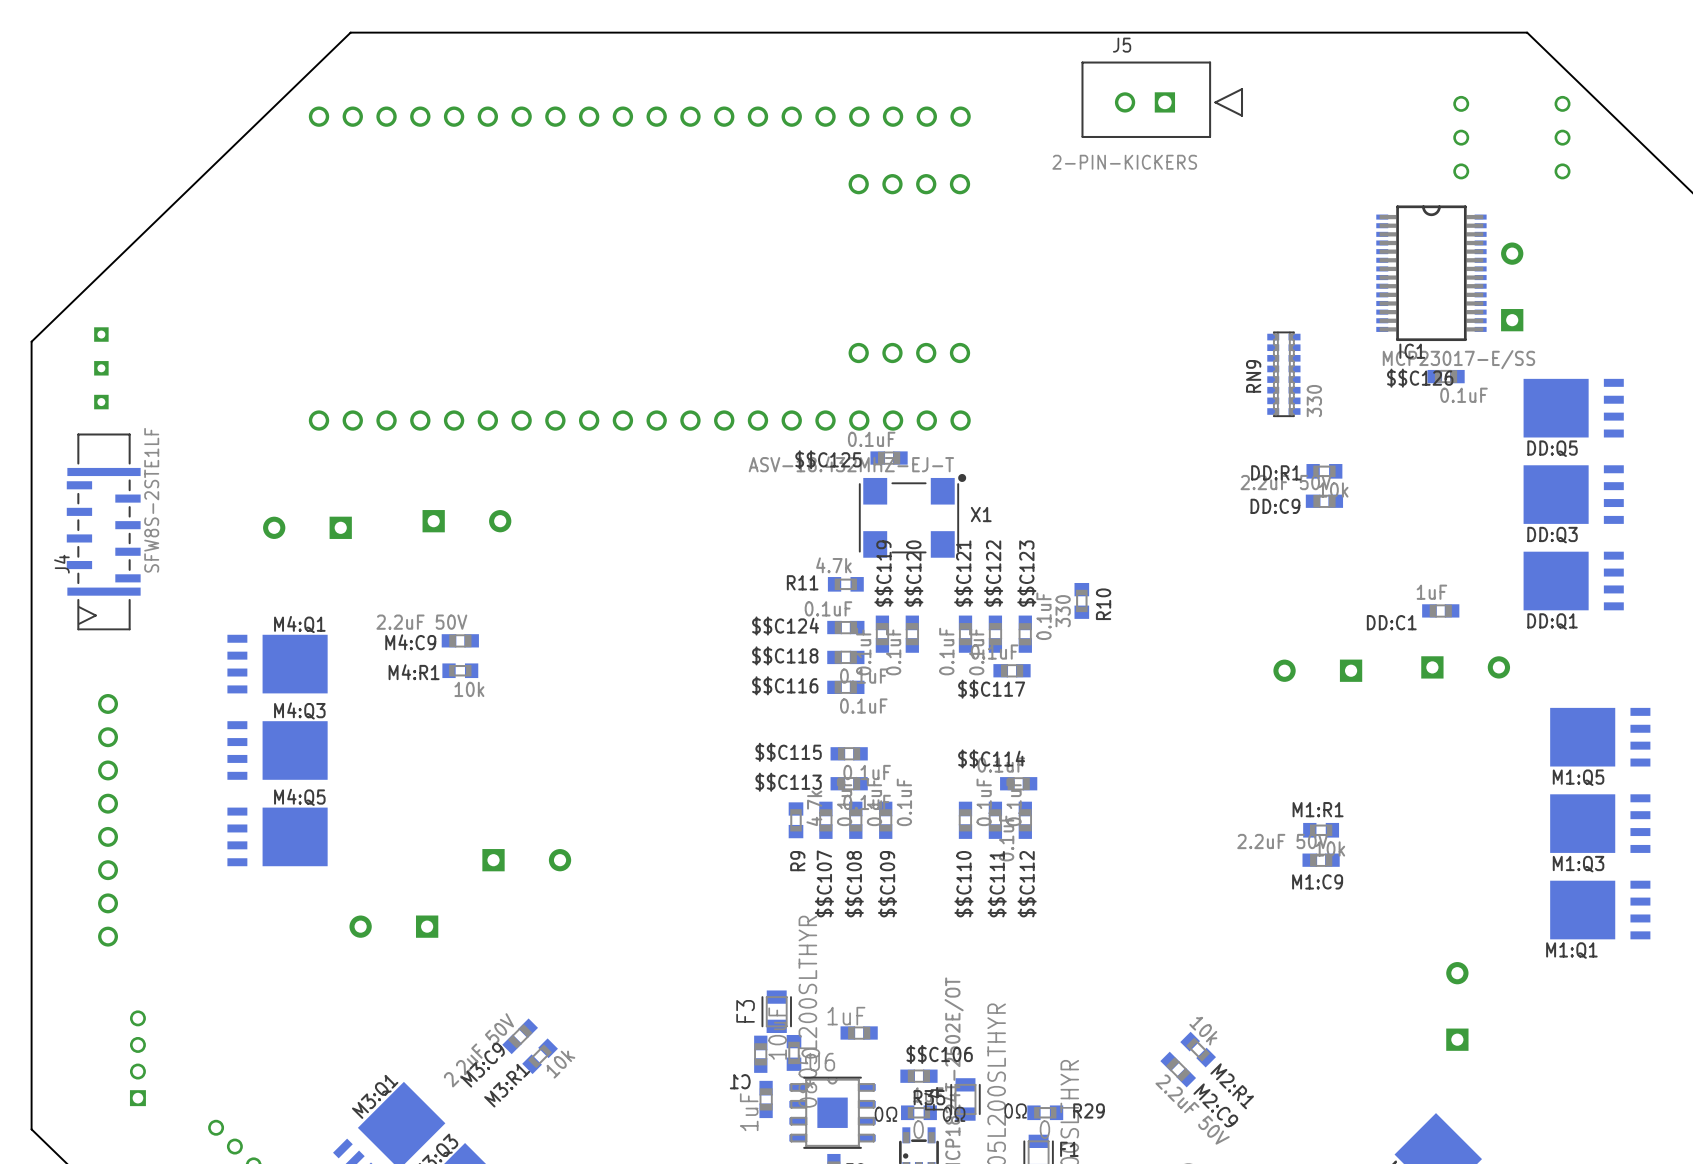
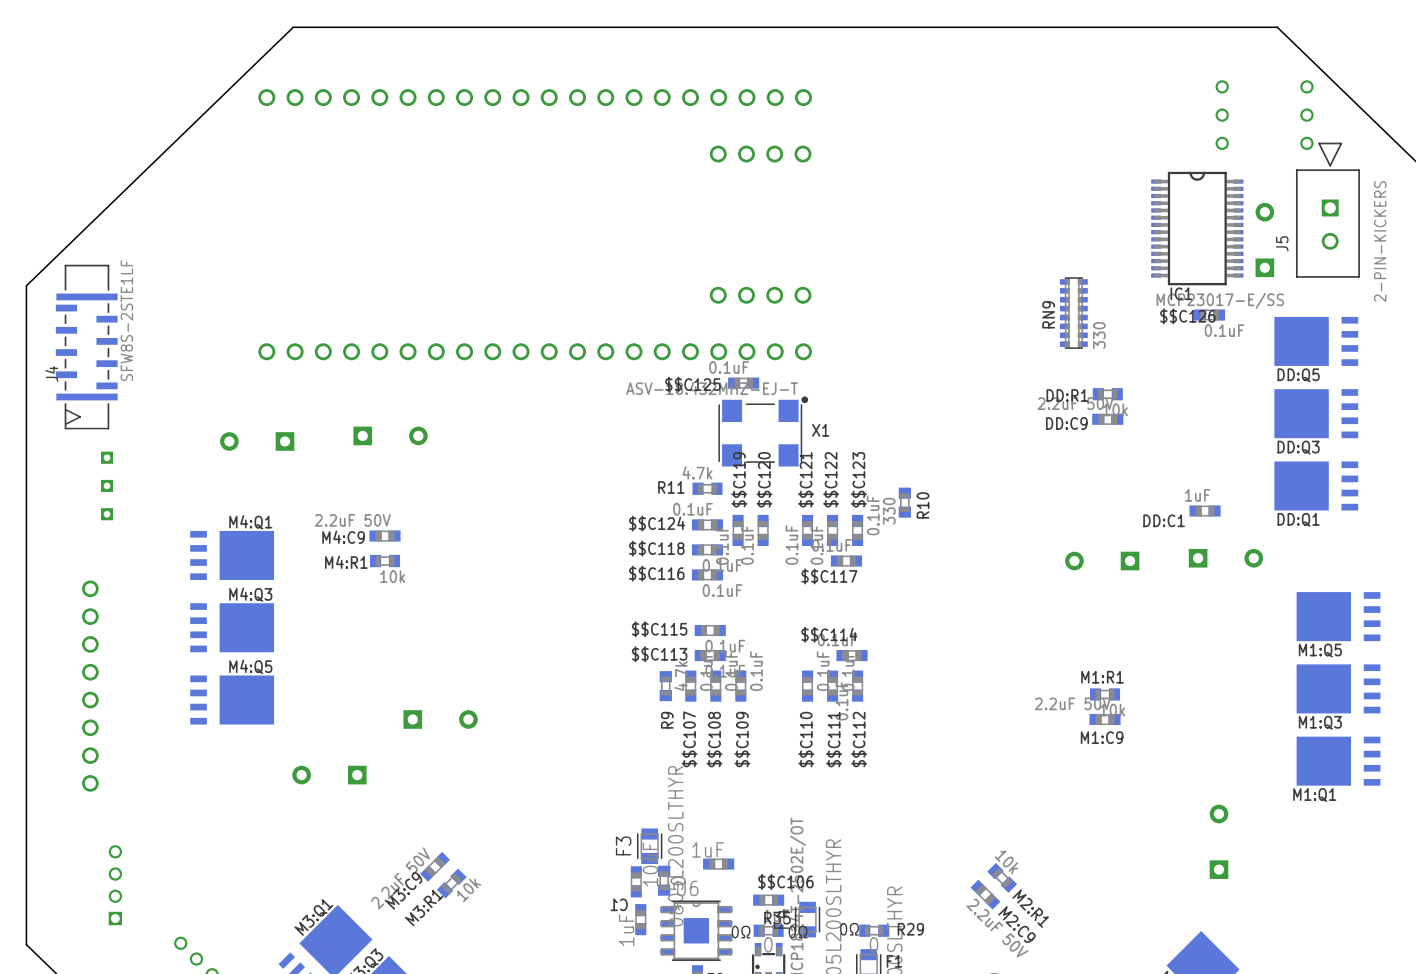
J5 rotation: 0° (1162, 99) -> 90° counterclockwise (1327, 210)
J5 position: (1162, 99) -> (1327, 210)
part position: (101, 368) -> (107, 485)
J4 position: (103, 531) -> (86, 347)

